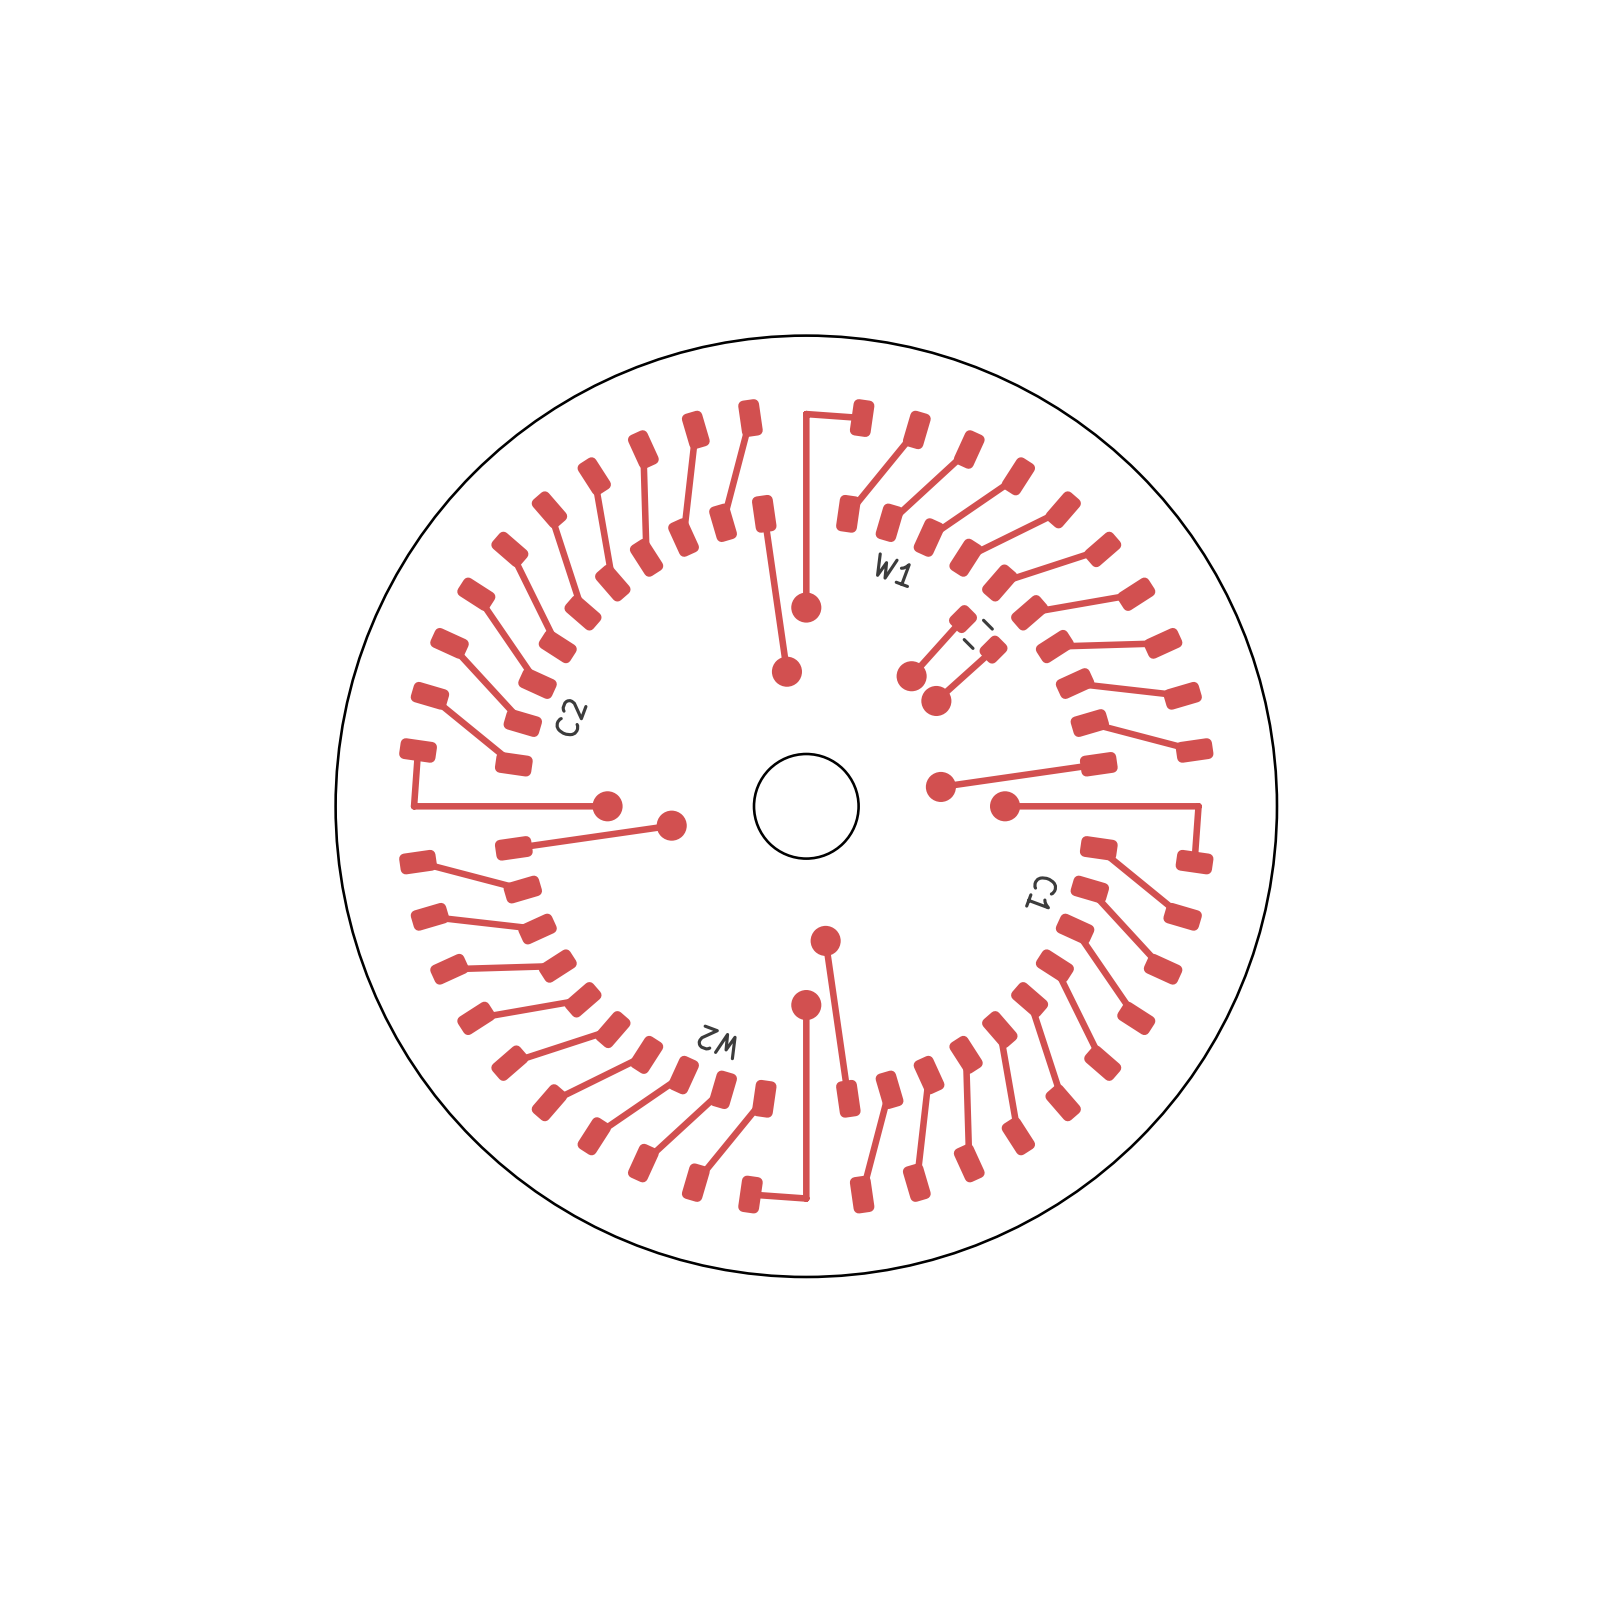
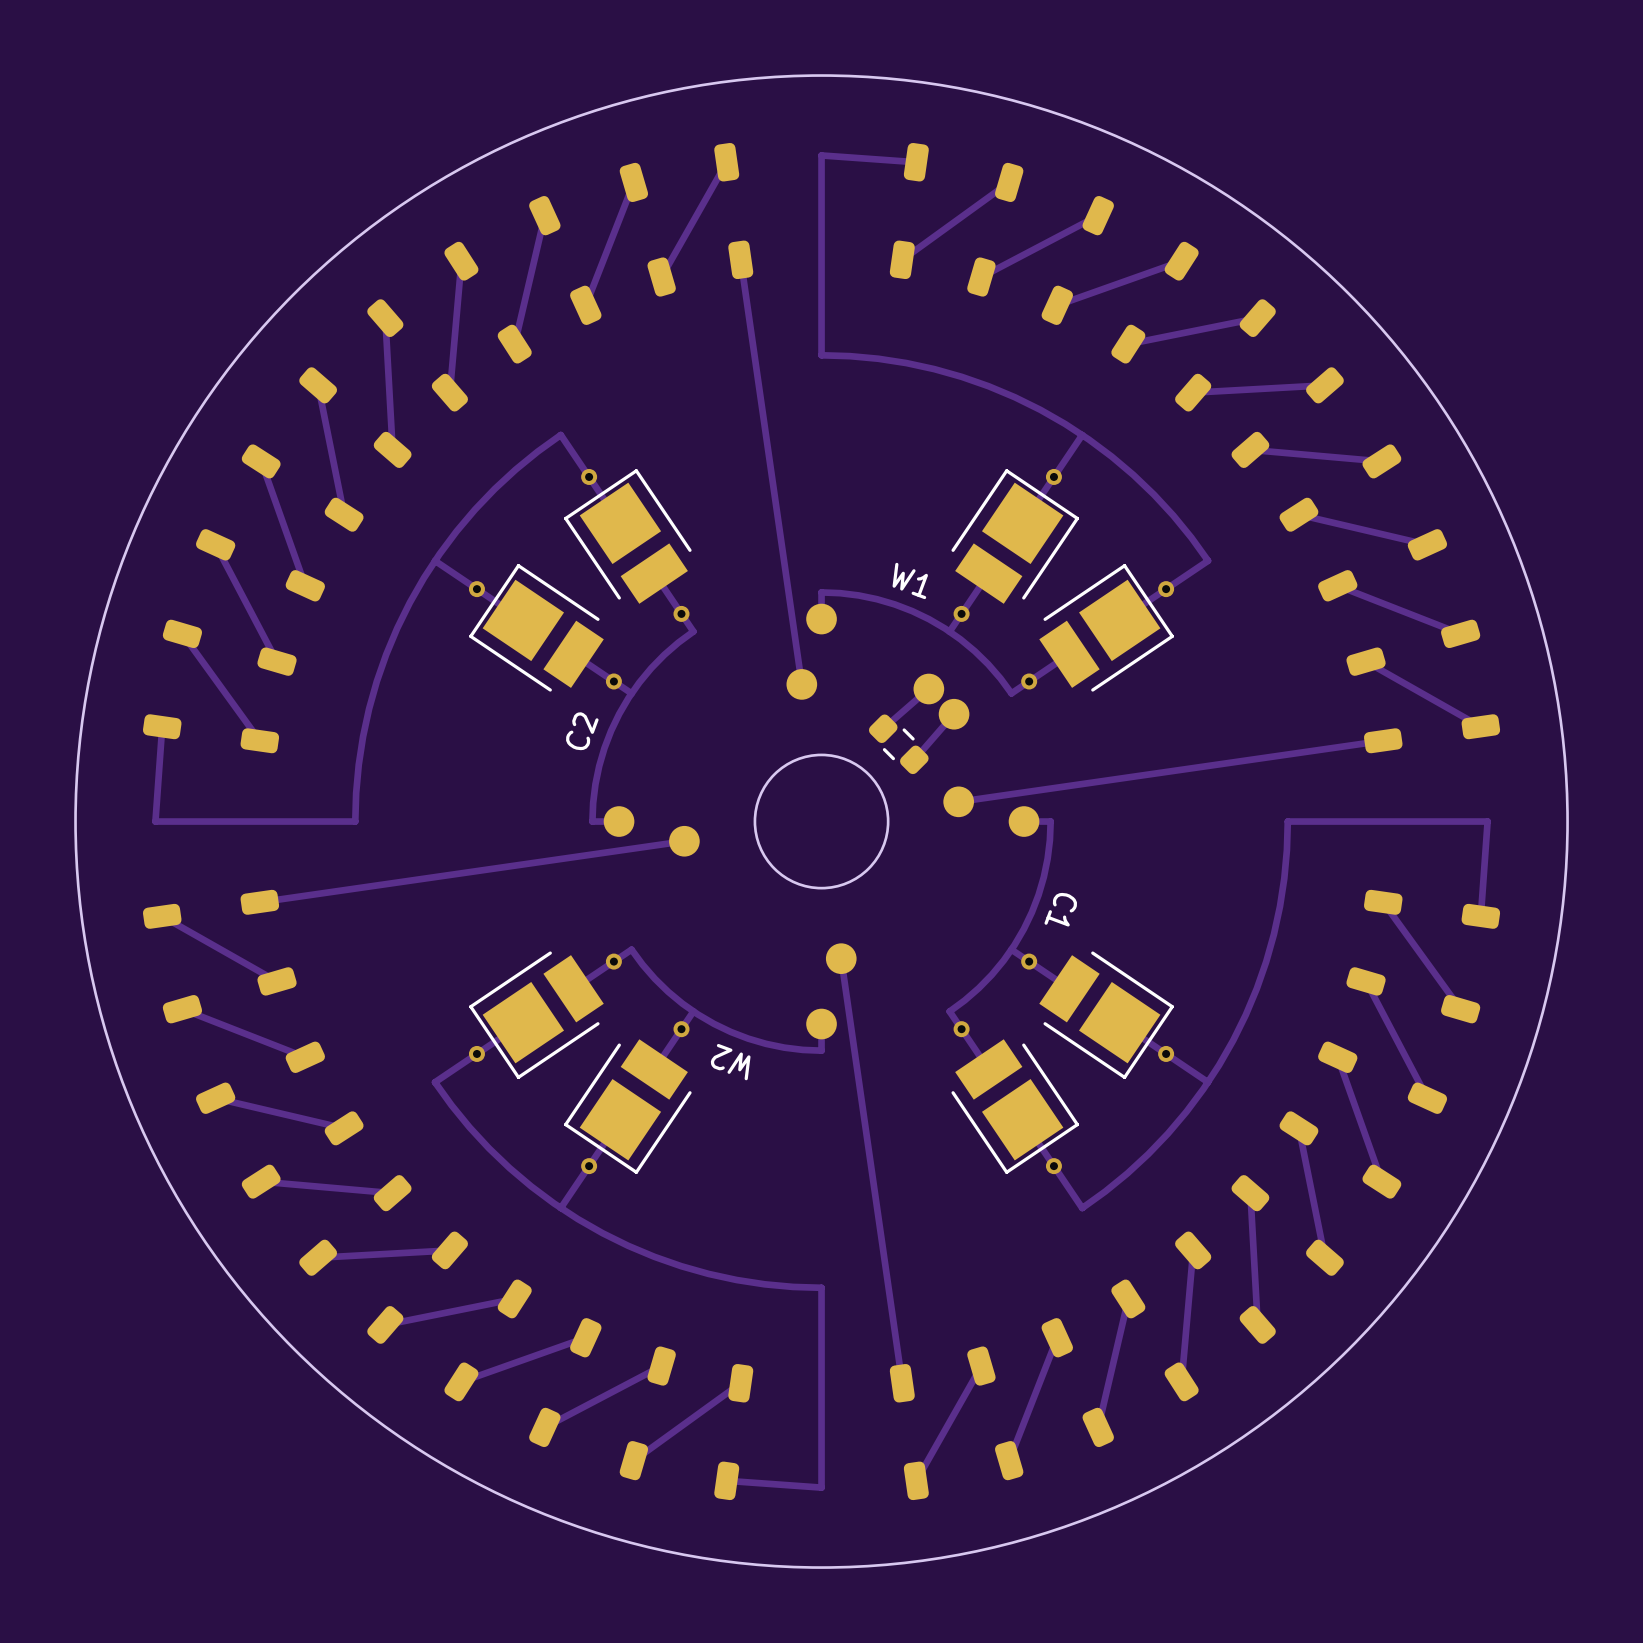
round board edge: none -> [74, 74, 1569, 1569]
track: none -> (726, 162) (661, 277)
track: none -> (916, 162) (821, 155) (821, 355) (878, 358) (906, 363) (934, 369) (988, 386) (1014, 397) (1065, 423) (1088, 439) (1133, 475) (1173, 515) (1208, 560) (1119, 620)
track: none -> (633, 182) (585, 305)
track: none -> (1009, 182) (902, 259)
track: none -> (544, 215) (514, 344)
track: none -> (1098, 215) (981, 277)
track: none -> (740, 259) (778, 523)
track: none -> (461, 261) (449, 392)
track: none -> (1181, 261) (1057, 305)
part: none -> (488, 302)
part: none -> (1155, 302)
track: none -> (385, 318) (392, 449)
track: none -> (1257, 318) (1128, 344)
round board edge: [334, 334, 1279, 1279] -> none
track: none -> (318, 385) (344, 514)
track: none -> (1324, 385) (1193, 392)
track: (750, 418) (723, 522) -> none
track: (862, 418) (806, 414) (806, 581) -> (1069, 654) (1011, 693) (988, 664) (974, 651) (960, 639) (929, 619) (894, 604) (876, 599) (858, 595) (821, 592)
track: none -> (1082, 434) (1022, 523)
track: (695, 429) (683, 537) -> none
track: (916, 429) (848, 513) -> none
track: none -> (1250, 449) (1381, 461)
track: (643, 449) (646, 557) -> none
track: (969, 449) (889, 522) -> none
track: none -> (261, 461) (305, 585)
part footprint: [577, 457, 664, 577] -> [564, 469, 692, 604]
part footprint: [949, 457, 1036, 577] -> [951, 469, 1079, 604]
part position: (757, 465) -> (733, 211)
part position: (855, 465) -> (909, 211)
via: none -> (589, 476)
via: none -> (1053, 476)
track: (594, 476) (612, 582) -> none
part position: (709, 476) -> (647, 229)
part position: (903, 476) -> (995, 229)
track: (1018, 476) (929, 537) -> none
part: none -> (302, 488)
part: none -> (1340, 488)
part position: (663, 493) -> (565, 260)
part position: (949, 493) -> (1077, 260)
track: none -> (1298, 514) (1427, 544)
track: (549, 509) (582, 612) -> none
track: (1063, 509) (966, 557) -> none
track: none -> (620, 523) (560, 434) (515, 469) (475, 509) (456, 531) (423, 577) (397, 628) (386, 654) (376, 681) (363, 736) (358, 764) (355, 821) (155, 821) (162, 726)
track: none -> (215, 544) (277, 661)
part position: (581, 546) -> (417, 355)
part position: (1031, 546) -> (1225, 355)
track: (509, 549) (557, 646) -> none
track: (1102, 549) (999, 582) -> none
track: none -> (434, 560) (523, 620)
track: none -> (988, 573) (949, 631)
track: none -> (1337, 585) (1460, 633)
part footprint: [457, 577, 577, 664] -> [469, 564, 604, 692]
part footprint: [1035, 577, 1156, 664] -> [1039, 564, 1174, 692]
via: none -> (476, 589)
via: none -> (1166, 589)
part position: (546, 581) -> (355, 417)
part position: (1066, 581) -> (1287, 417)
track: (476, 594) (537, 683) -> none
track: (1136, 594) (1029, 612) -> none
via: none -> (681, 613)
via: none -> (961, 613)
track: (963, 619) (911, 676) -> (883, 728) (928, 689)
track: none -> (182, 633) (259, 740)
part position: (978, 634) -> (898, 744)
track: none -> (573, 654) (631, 693)
track: (449, 643) (522, 723) -> none
track: (1163, 643) (1054, 646) -> none
track: (993, 649) (936, 700) -> (914, 759) (954, 714)
track: none -> (1366, 661) (1480, 726)
part position: (493, 663) -> (260, 565)
part position: (1119, 663) -> (1382, 565)
via: none -> (613, 681)
via: none -> (1029, 681)
track: (1075, 683) (1182, 695) -> none
track: (429, 695) (513, 764) -> none
part position: (476, 709) -> (229, 647)
part position: (1136, 709) -> (1413, 647)
track: (1089, 723) (1194, 750) -> none
track: none -> (1383, 740) (1119, 778)
round board edge: none -> [753, 753, 890, 890]
track: (418, 750) (414, 806) (581, 806) -> (654, 573) (693, 631) (664, 654) (651, 668) (628, 697) (619, 713) (611, 730) (599, 766) (595, 784) (592, 821)
round board edge: [752, 752, 860, 860] -> none
part position: (465, 757) -> (211, 733)
part position: (1146, 757) -> (1432, 733)
track: (1031, 806) (1198, 806) (1194, 862) -> (1050, 821) (1049, 840) (1043, 876) (1031, 912) (1023, 929) (1003, 960) (991, 974) (978, 988) (949, 1011) (988, 1069)
track: none -> (523, 864) (259, 902)
track: (1098, 848) (1182, 916) -> none
part position: (465, 855) -> (211, 909)
part position: (1146, 855) -> (1432, 909)
track: (418, 862) (522, 889) -> none
track: none -> (1383, 902) (1460, 1009)
track: (1089, 889) (1163, 969) -> none
track: none -> (162, 916) (277, 981)
track: none -> (1480, 916) (1487, 821) (1287, 821) (1286, 850) (1279, 906) (1266, 961) (1256, 988) (1245, 1014) (1219, 1065) (1186, 1111) (1168, 1133) (1127, 1173) (1082, 1208) (1022, 1119)
part position: (476, 903) -> (229, 995)
part position: (1136, 903) -> (1413, 995)
track: (429, 916) (537, 929) -> none
track: (1075, 929) (1136, 1018) -> none
track: none -> (1011, 949) (1069, 988)
via: none -> (613, 961)
via: none -> (1029, 961)
part footprint: [457, 949, 577, 1036] -> [469, 951, 604, 1079]
part position: (493, 949) -> (260, 1077)
part footprint: [1035, 949, 1156, 1036] -> [1039, 951, 1174, 1079]
part position: (1119, 949) -> (1382, 1077)
track: none -> (1366, 981) (1427, 1098)
track: (557, 966) (449, 969) -> none
track: (1054, 966) (1102, 1063) -> none
track: none -> (182, 1009) (305, 1057)
track: none -> (693, 1011) (654, 1069)
track: (582, 999) (476, 1018) -> none
track: (1029, 999) (1063, 1102) -> none
track: none -> (523, 1022) (434, 1082) (469, 1127) (509, 1168) (554, 1203) (577, 1219) (602, 1233) (654, 1256) (708, 1273) (736, 1279) (793, 1286) (821, 1287) (821, 1487) (726, 1480)
track: none -> (1119, 1022) (1208, 1082)
via: none -> (681, 1029)
via: none -> (961, 1029)
track: (612, 1029) (509, 1063) -> none
track: (999, 1029) (1018, 1136) -> none
part position: (546, 1031) -> (355, 1225)
track: (806, 1031) (806, 1198) (750, 1194) -> (821, 1050) (784, 1047) (766, 1043) (748, 1038) (713, 1023) (682, 1003) (668, 991) (642, 964) (631, 949) (573, 988)
part position: (1066, 1031) -> (1287, 1225)
via: none -> (476, 1053)
via: none -> (1166, 1053)
part footprint: [577, 1035, 664, 1156] -> [564, 1039, 692, 1174]
part footprint: [949, 1035, 1036, 1156] -> [951, 1039, 1079, 1174]
track: none -> (1337, 1057) (1381, 1181)
track: (646, 1054) (549, 1102) -> none
track: (966, 1054) (969, 1163) -> none
part position: (581, 1066) -> (417, 1287)
part position: (1031, 1066) -> (1225, 1287)
track: (683, 1075) (594, 1136) -> none
track: (929, 1075) (916, 1182) -> none
track: none -> (215, 1098) (344, 1128)
track: (723, 1089) (643, 1163) -> none
track: (889, 1089) (862, 1194) -> none
track: none -> (620, 1119) (560, 1208)
track: (764, 1098) (695, 1182) -> none
track: none -> (864, 1119) (902, 1383)
track: none -> (1298, 1128) (1324, 1257)
part position: (663, 1119) -> (565, 1382)
part position: (949, 1119) -> (1077, 1382)
part: none -> (302, 1155)
part: none -> (1340, 1155)
part position: (709, 1136) -> (647, 1413)
part position: (903, 1136) -> (995, 1413)
via: none -> (589, 1166)
via: none -> (1053, 1166)
part position: (757, 1146) -> (733, 1432)
part position: (855, 1146) -> (909, 1432)
track: none -> (261, 1181) (392, 1193)
track: none -> (1250, 1193) (1257, 1324)
track: none -> (449, 1250) (318, 1257)
track: none -> (1193, 1250) (1181, 1381)
track: none -> (514, 1298) (385, 1324)
track: none -> (1128, 1298) (1098, 1427)
track: none -> (585, 1337) (461, 1381)
track: none -> (1057, 1337) (1009, 1460)
part: none -> (488, 1340)
part: none -> (1155, 1340)
track: none -> (661, 1366) (544, 1427)
track: none -> (981, 1366) (916, 1480)
track: none -> (740, 1383) (633, 1460)

